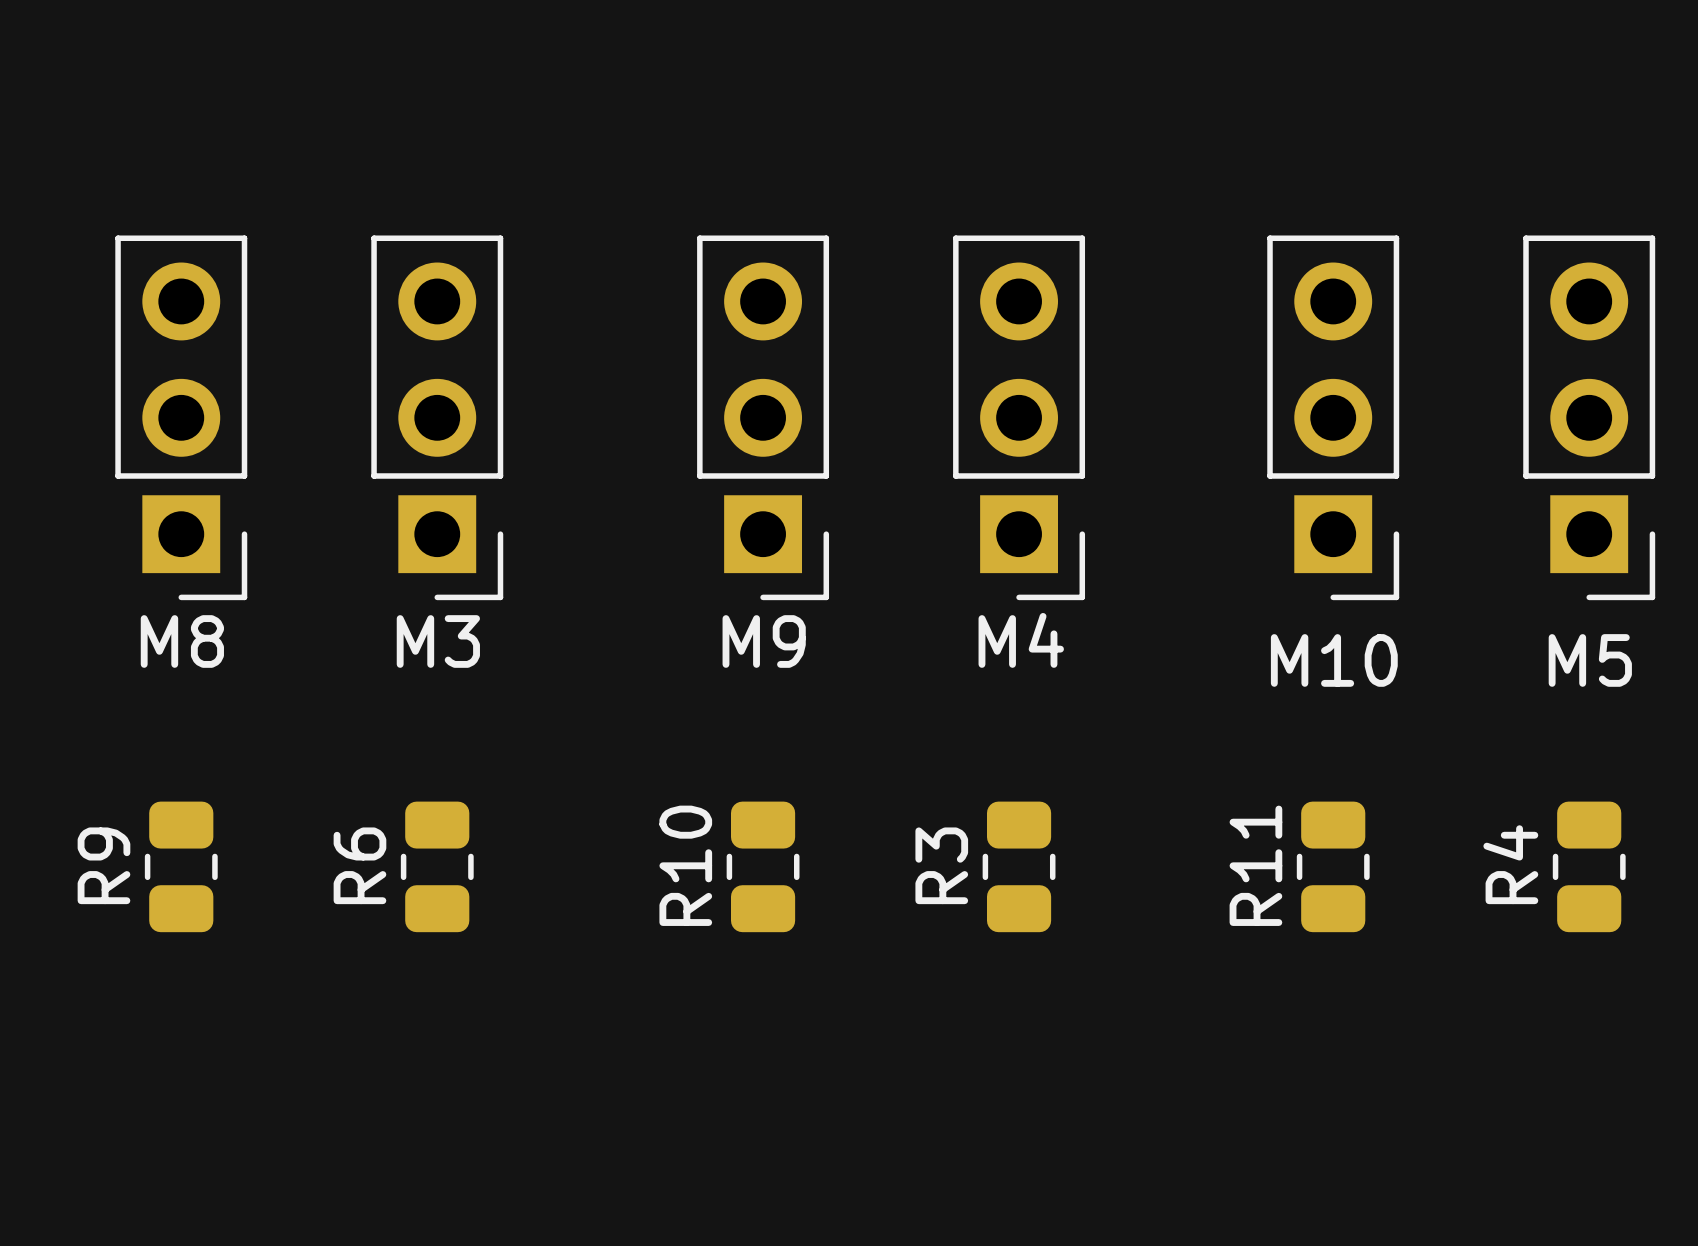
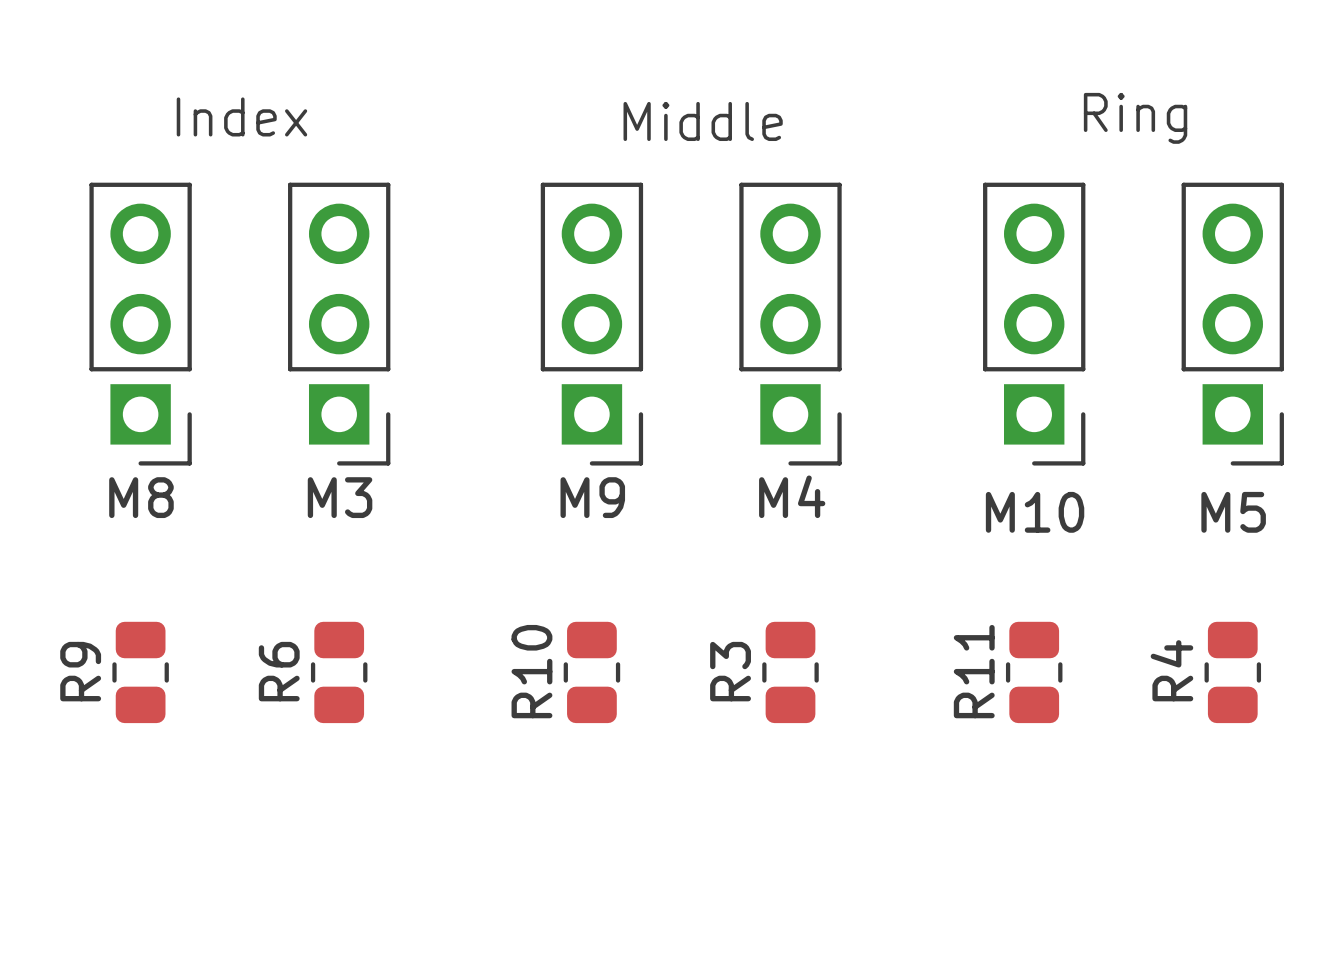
text: none -> Index (241, 116)
text: none -> Ring (1135, 118)
text: none -> Middle (703, 121)

